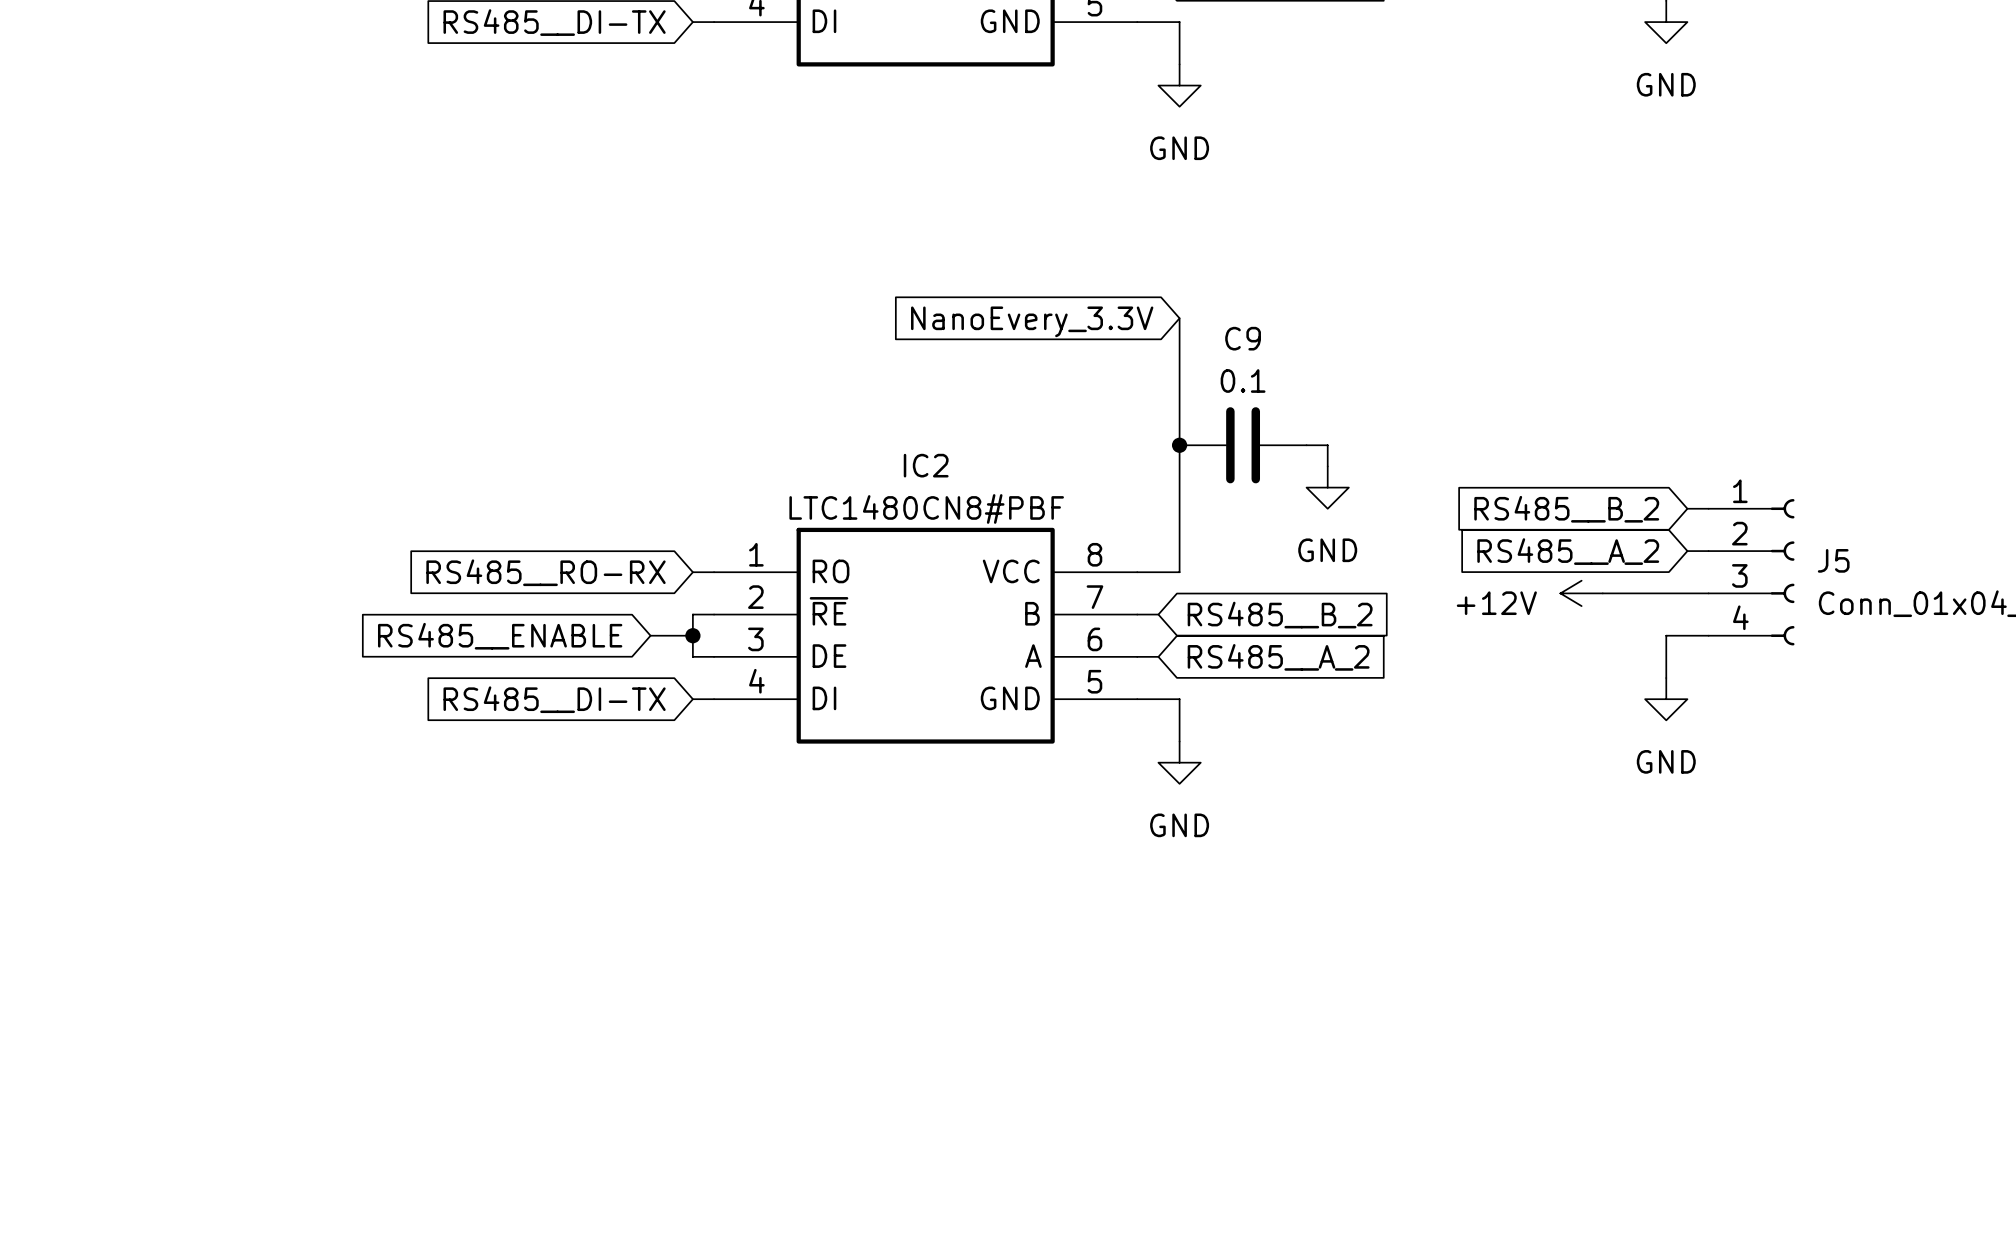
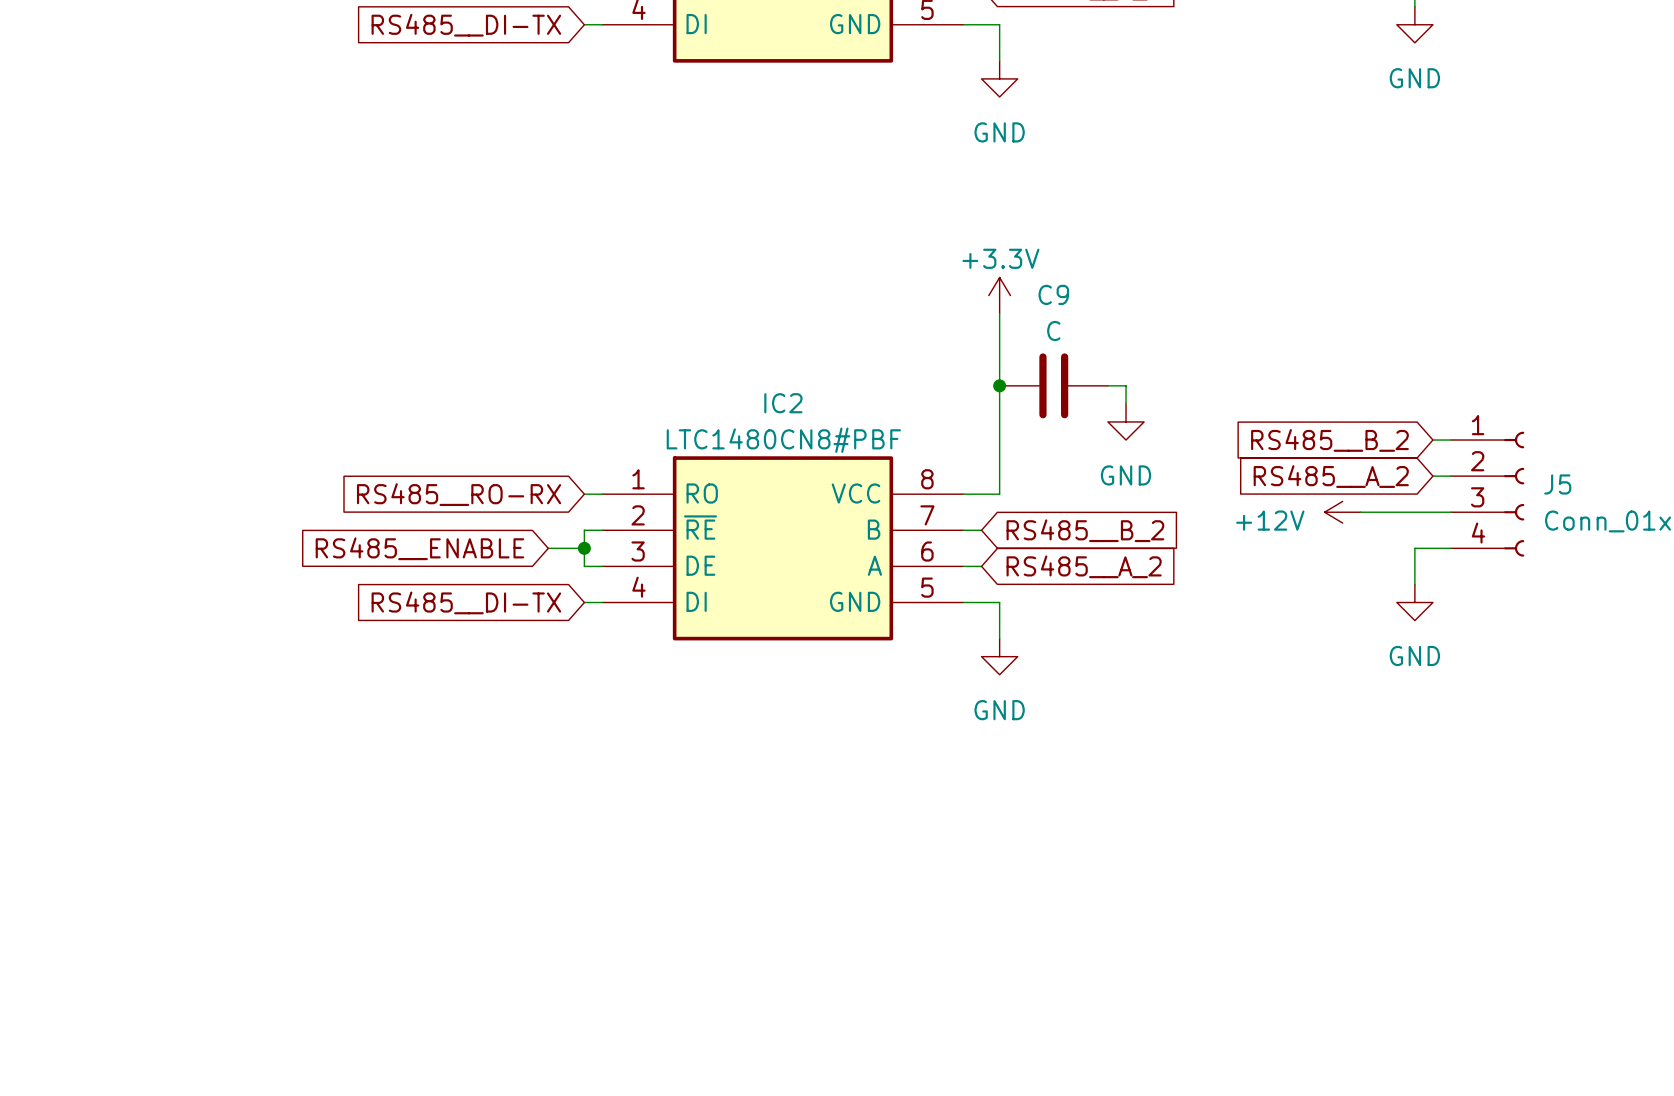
global label: NanoEvery_3.3V (1032, 321) -> none
power symbol: none -> +3.3V (999, 295)
C9 value: 0.1 (1243, 381) -> C (1053, 331)

